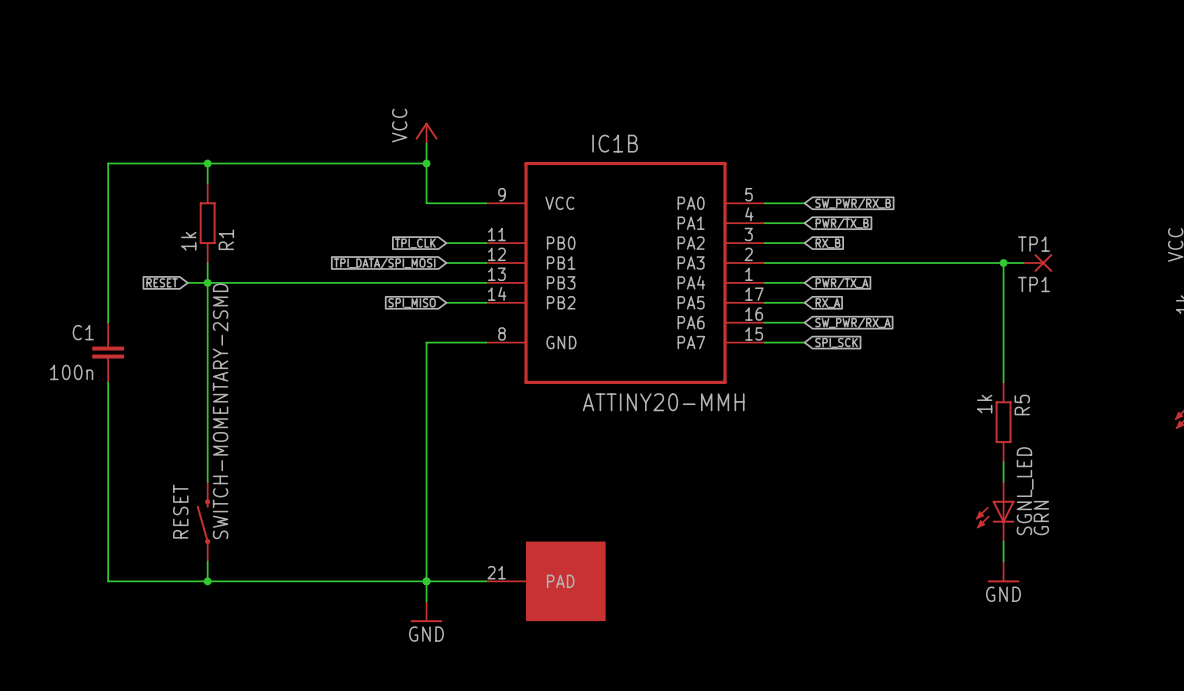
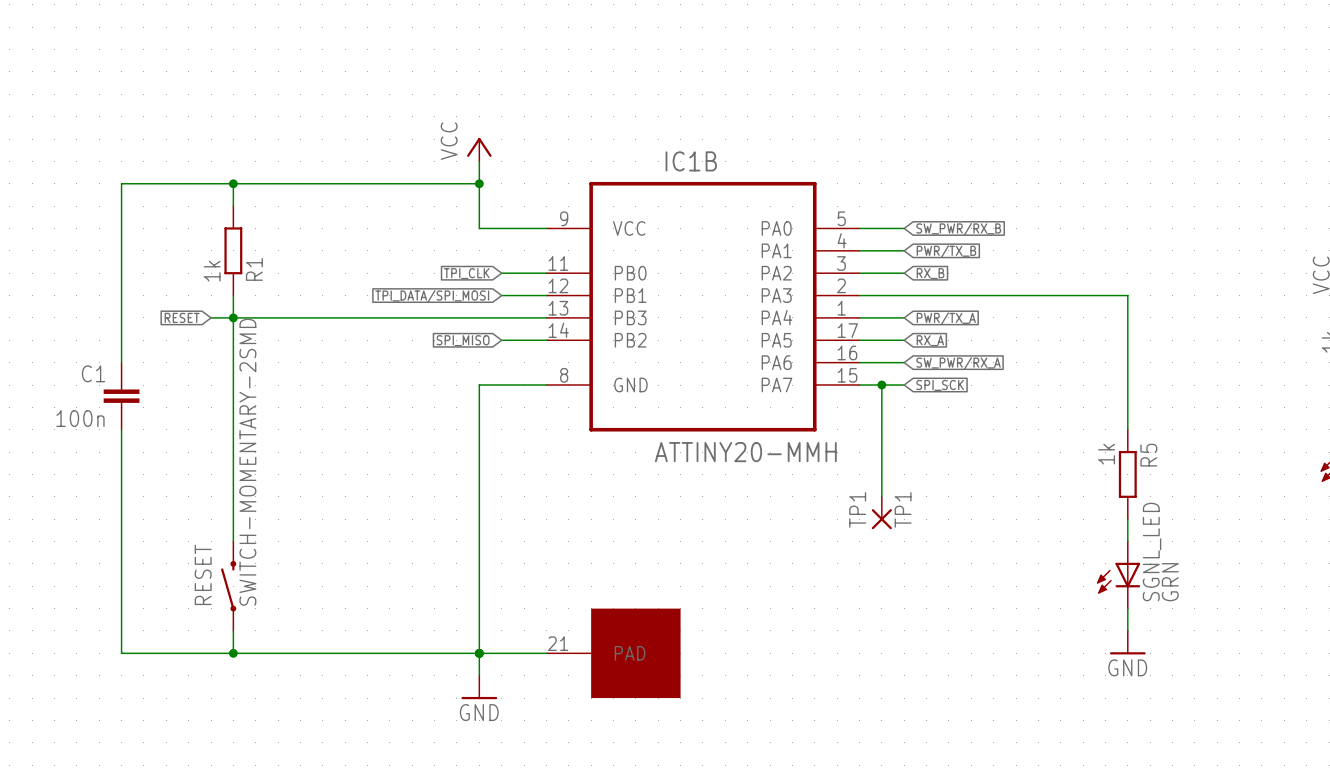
wire: (1003, 262) (1023, 262) -> none
junction: (1003, 262) -> none
TP1 position: (1037, 262) -> (881, 513)
TP1 rotation: 0° (1043, 262) -> 90° clockwise (881, 519)
wire: none -> (881, 385) (881, 496)
junction: none -> (881, 385)

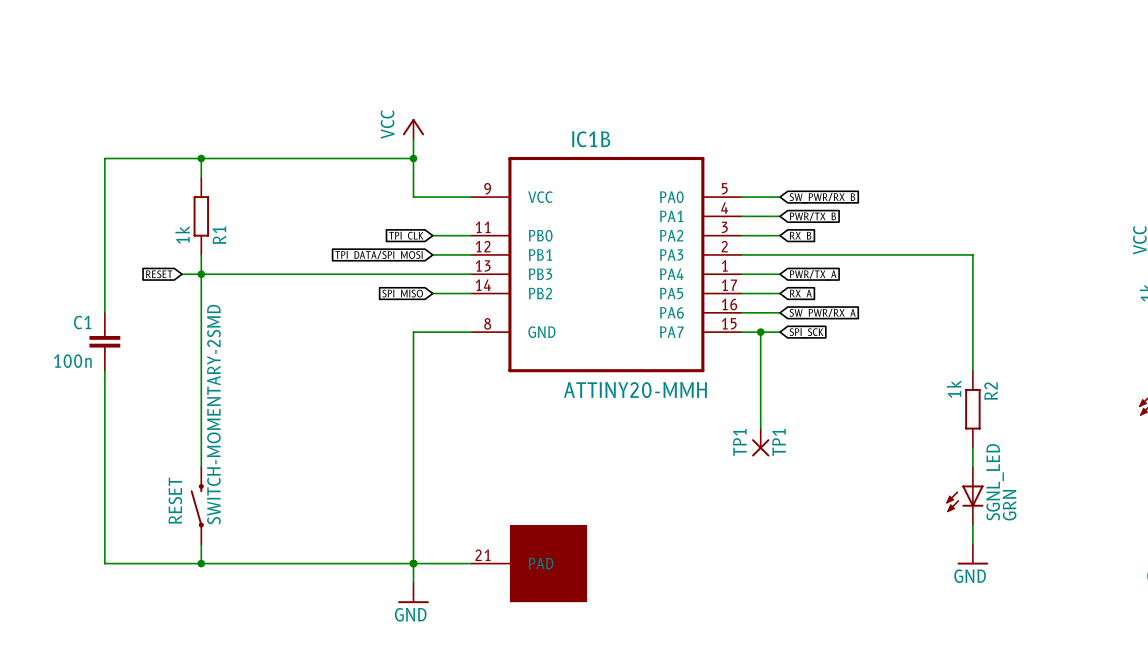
R5 name: R5 (1148, 455) -> R2 (991, 391)

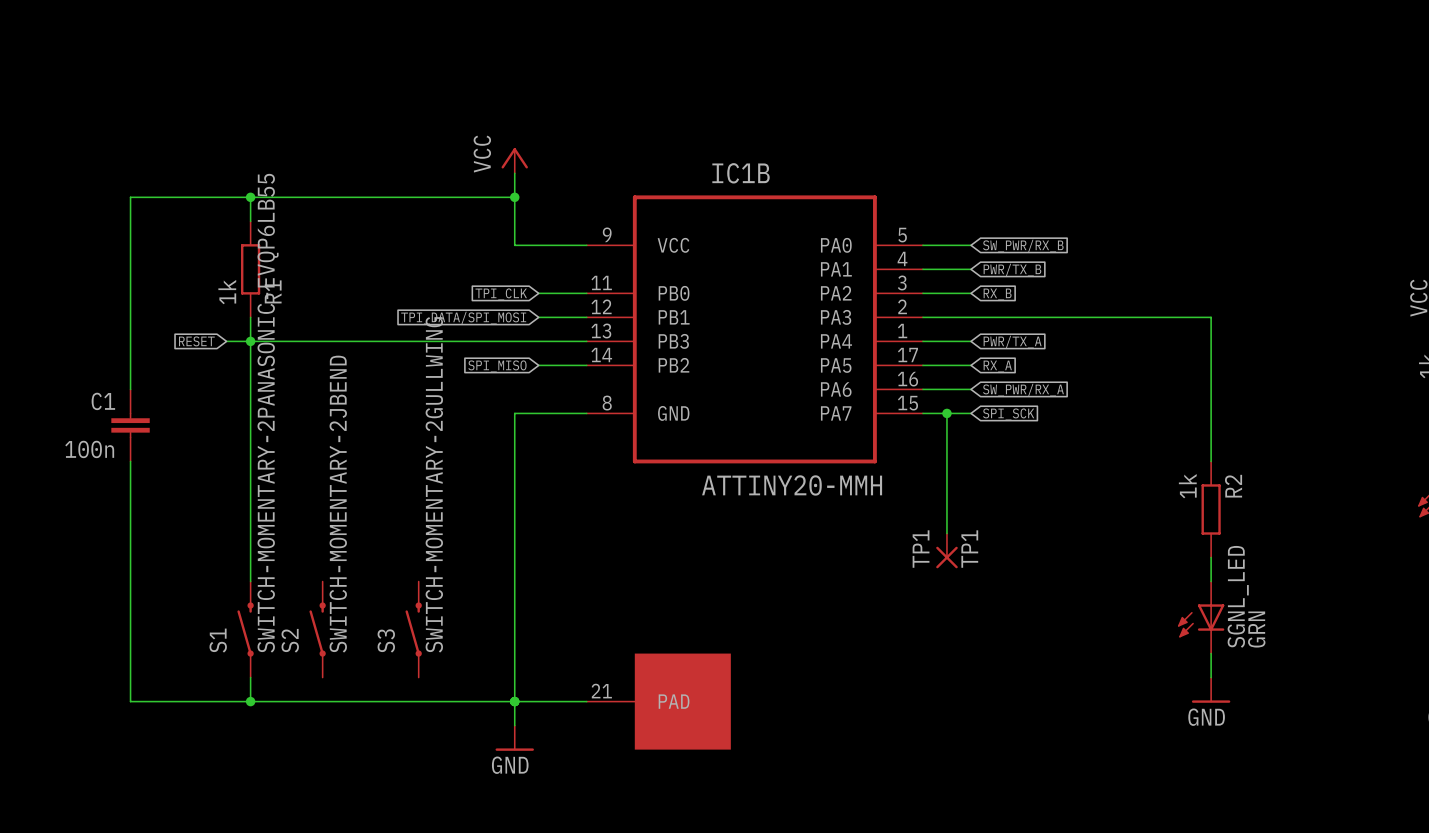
RESET value: SWITCH-MOMENTARY-2SMD (213, 414) -> SWITCH-MOMENTARY-2PANASONIC-EVQP6LB55 (268, 413)
RESET name: RESET (175, 500) -> S1 (218, 640)
S2: none -> SWITCH-MOMENTARY-2JBEND (317, 629)
S3: none -> SWITCH-MOMENTARY-2GULLWING (413, 629)

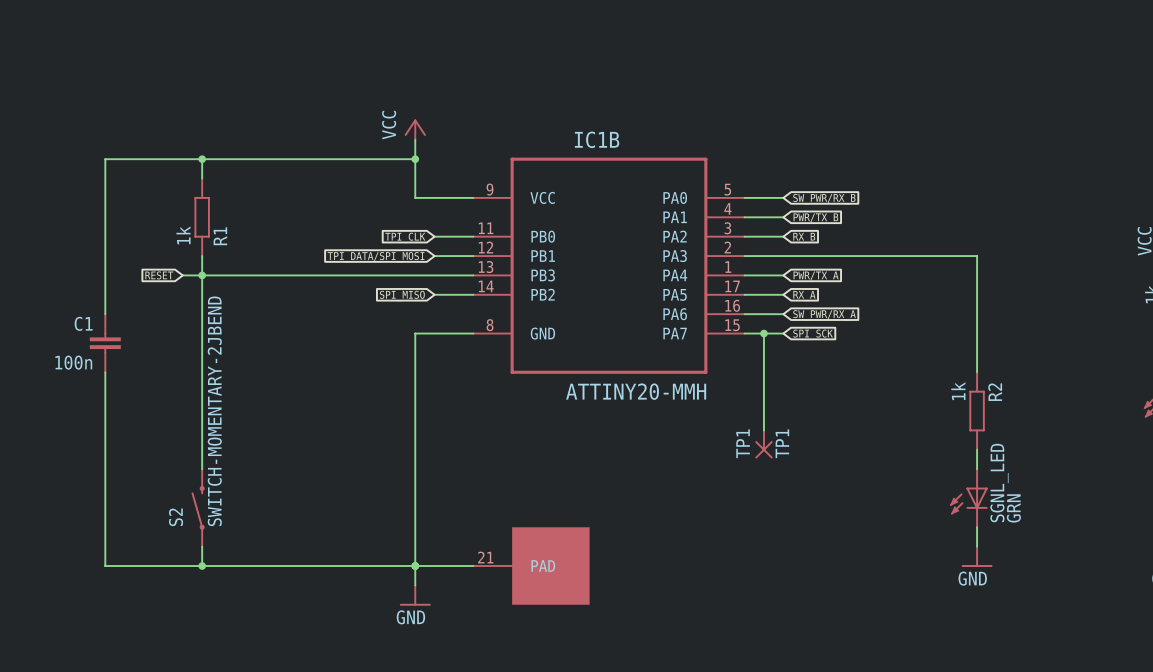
S1 value: SWITCH-MOMENTARY-2PANASONIC-EVQP6LB55 (268, 413) -> SWITCH-MOMENTARY-2JBEND (214, 411)
S2: SWITCH-MOMENTARY-2JBEND (317, 629) -> none
S3: SWITCH-MOMENTARY-2GULLWING (413, 629) -> none
S1 name: S1 (218, 640) -> S2 (176, 517)

